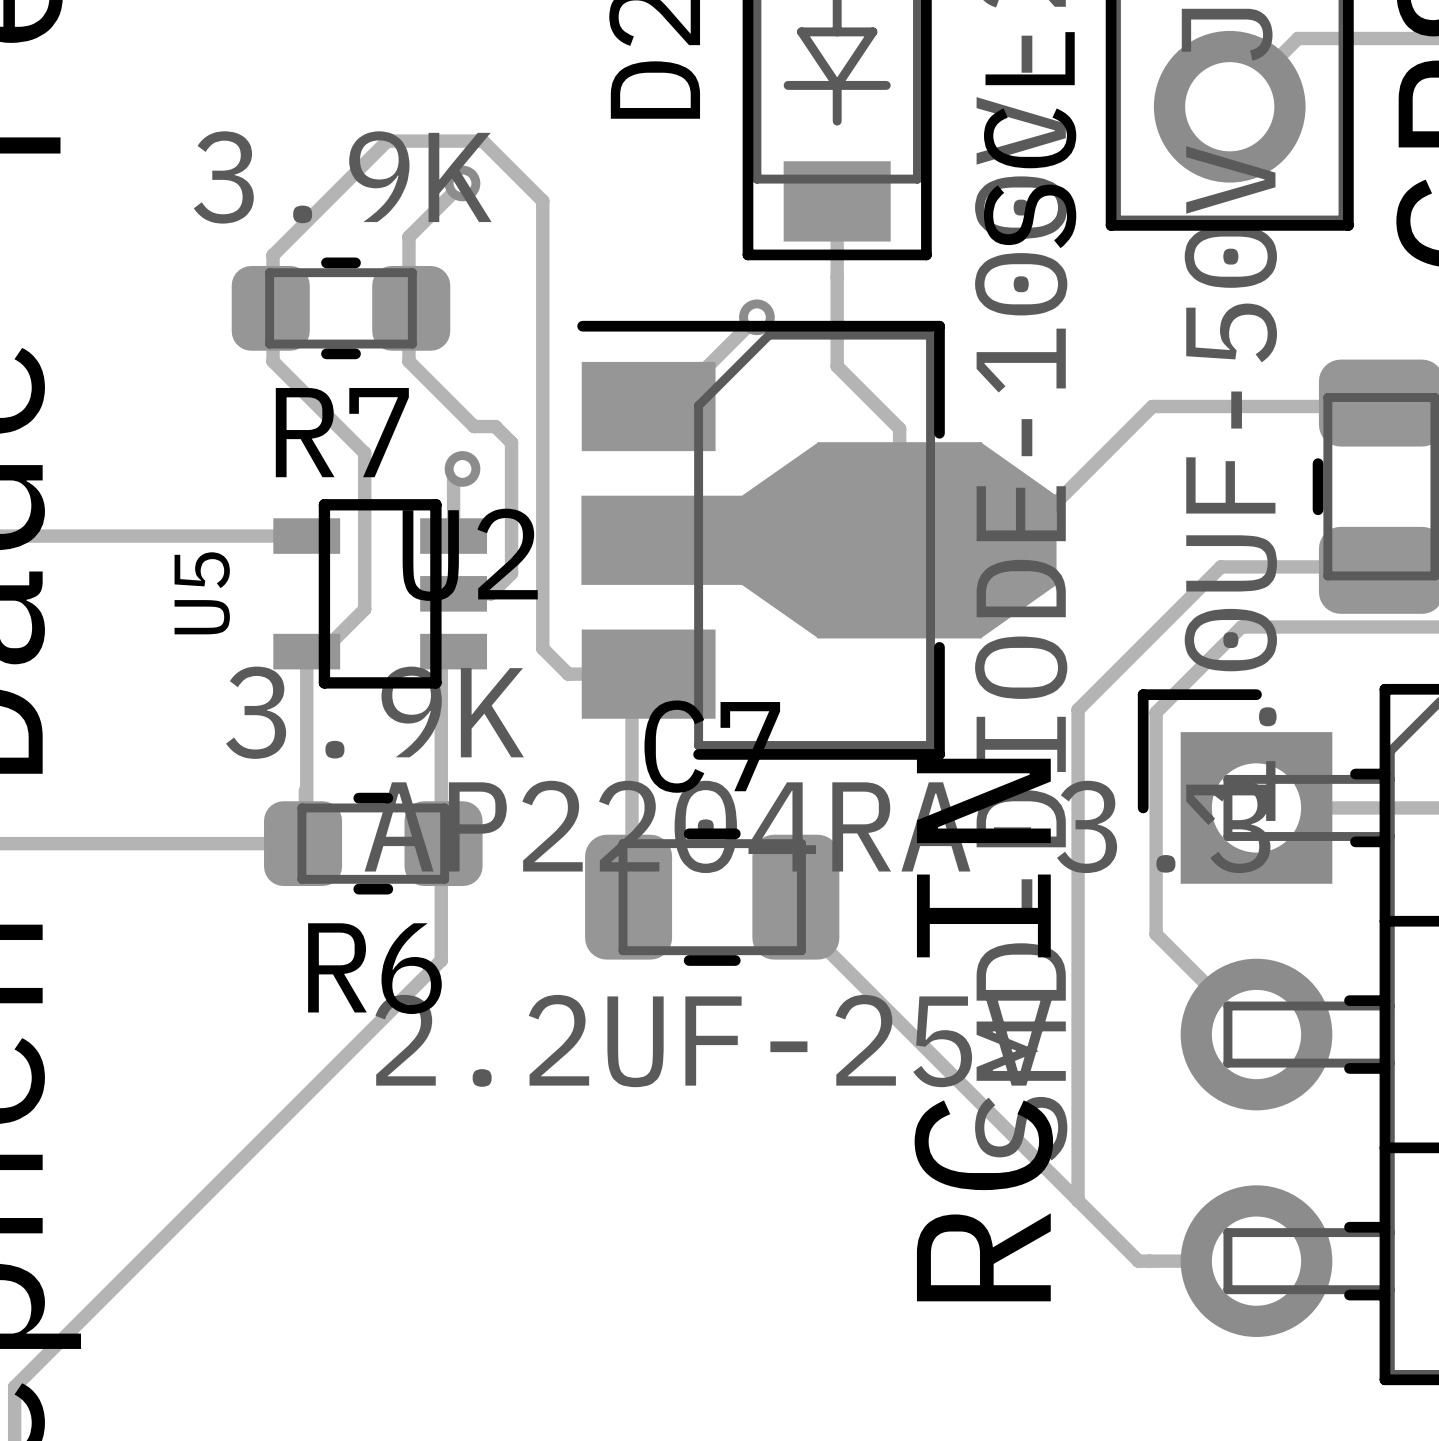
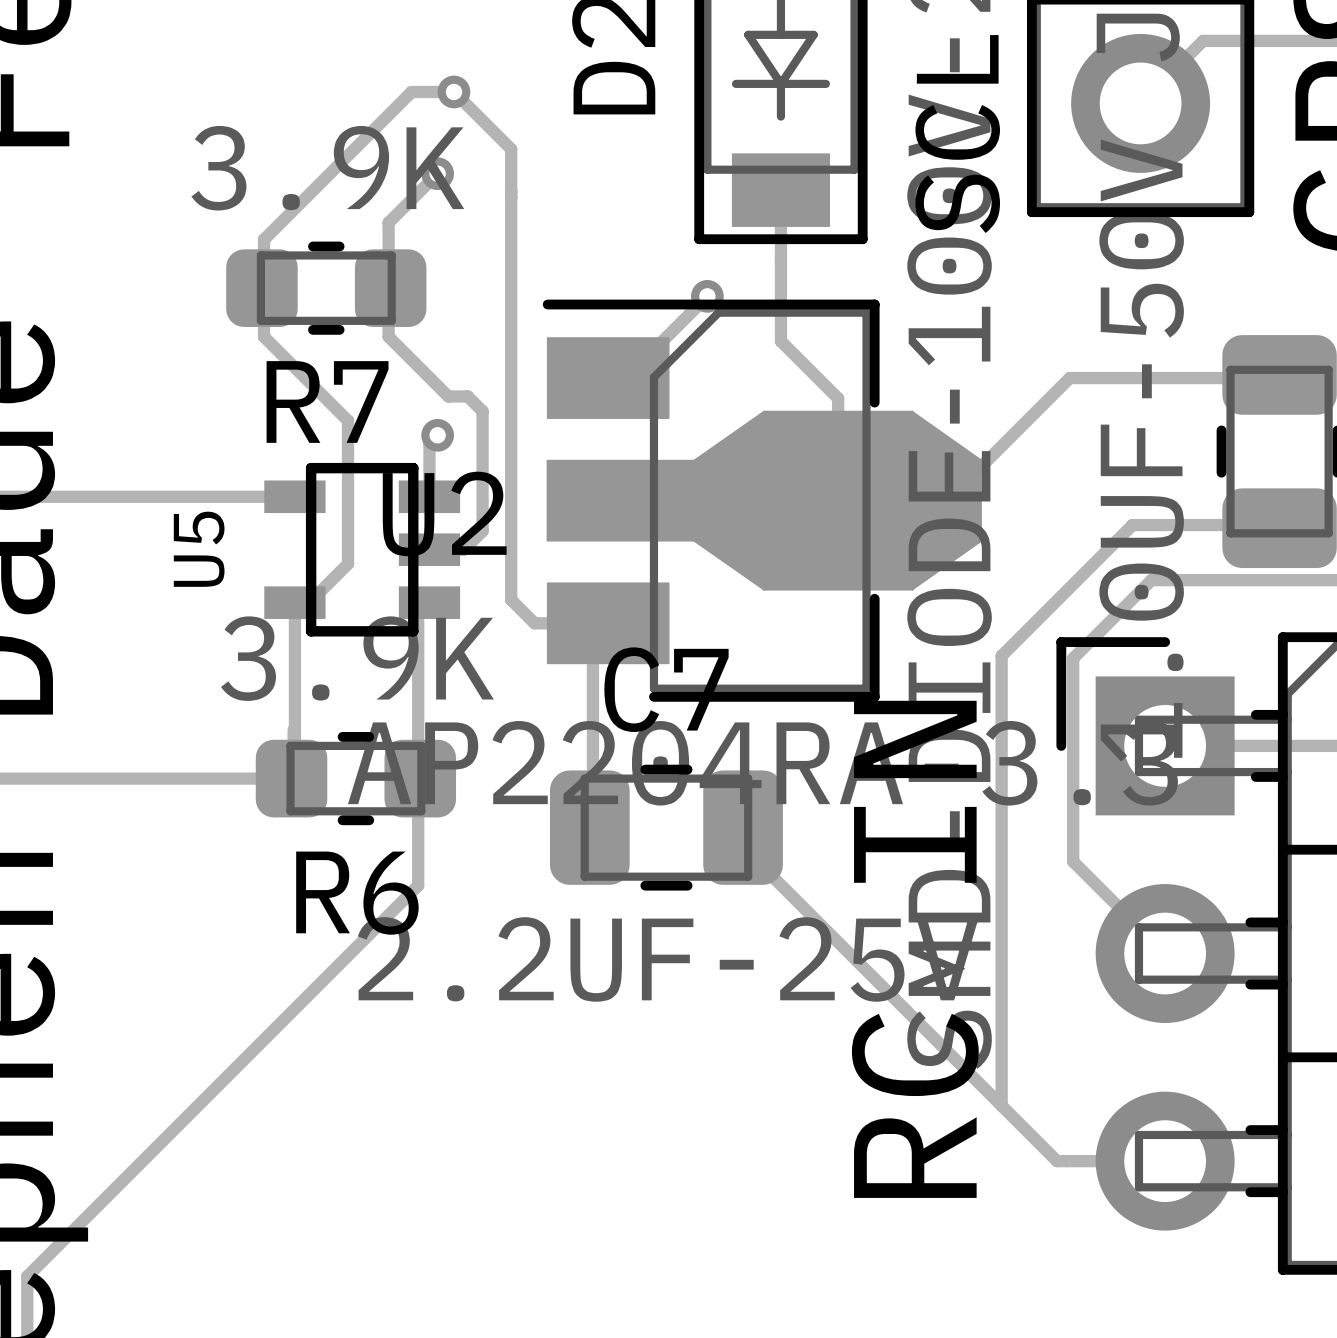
via: none -> (453, 91)
track: (387, 141) (482, 141) (542, 201) -> (368, 134) (411, 91) (453, 91) (511, 149) (511, 189)

